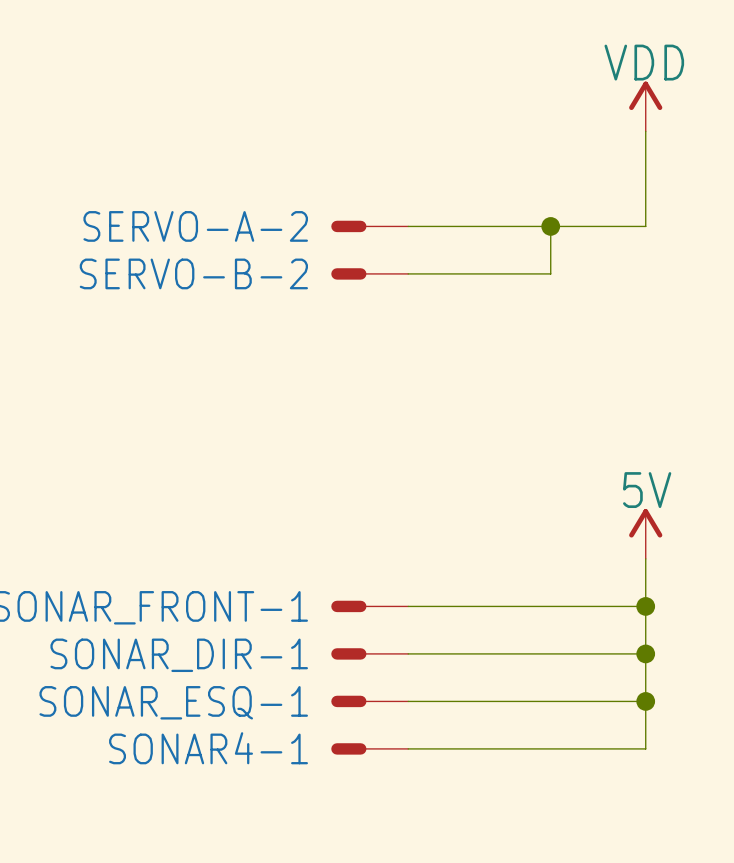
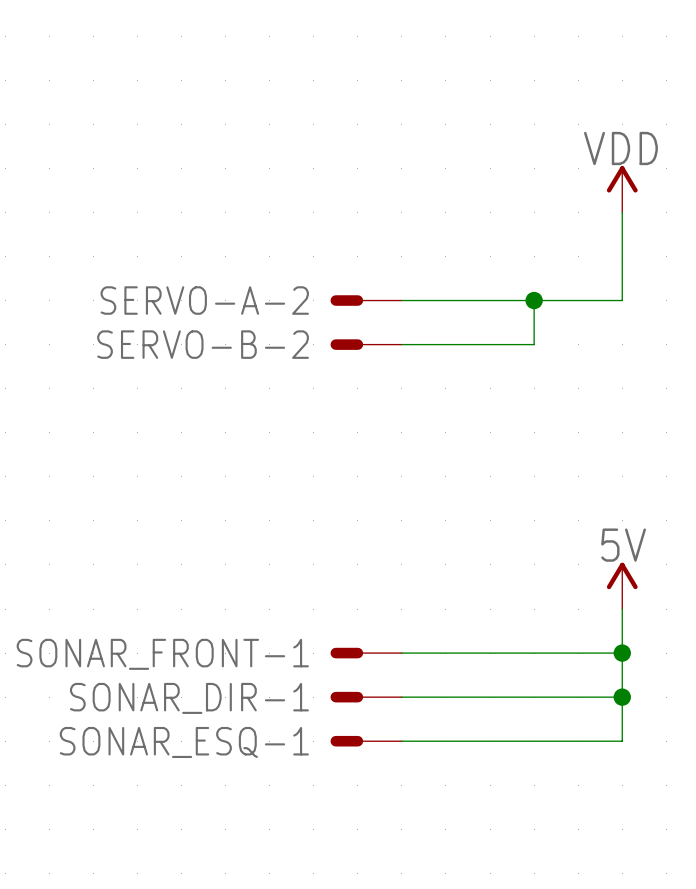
wire: (645, 701) (645, 748) (408, 748) -> none
junction: (645, 701) -> none
SONAR4-1: (369, 748) -> none

